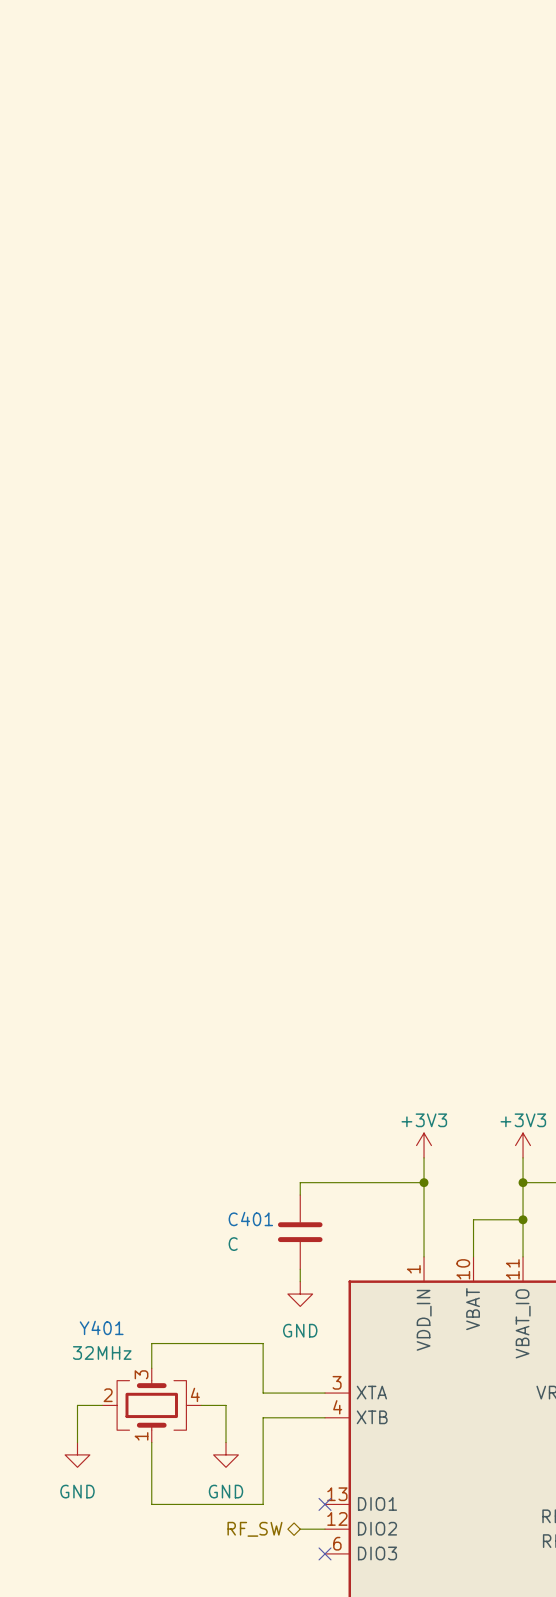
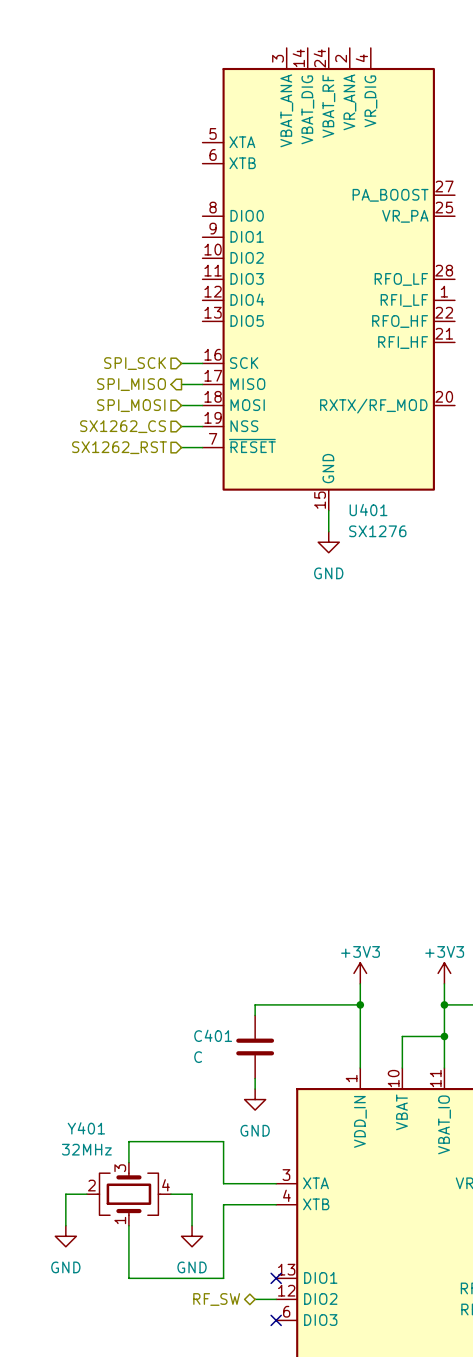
U401: none -> SX1276 (328, 279)
hierarchical label: none -> SPI_SCK (135, 363)
wire: none -> (181, 363) (202, 363)
hierarchical label: none -> SPI_MISO (131, 384)
wire: none -> (181, 384) (202, 384)
hierarchical label: none -> SPI_MOSI (131, 405)
wire: none -> (181, 405) (202, 405)
wire: none -> (181, 426) (202, 426)
hierarchical label: none -> SX1262_CS (123, 426)
hierarchical label: none -> SX1262_RST (119, 447)
wire: none -> (181, 447) (202, 447)
wire: none -> (328, 510) (328, 531)
power symbol: none -> GND (328, 542)

